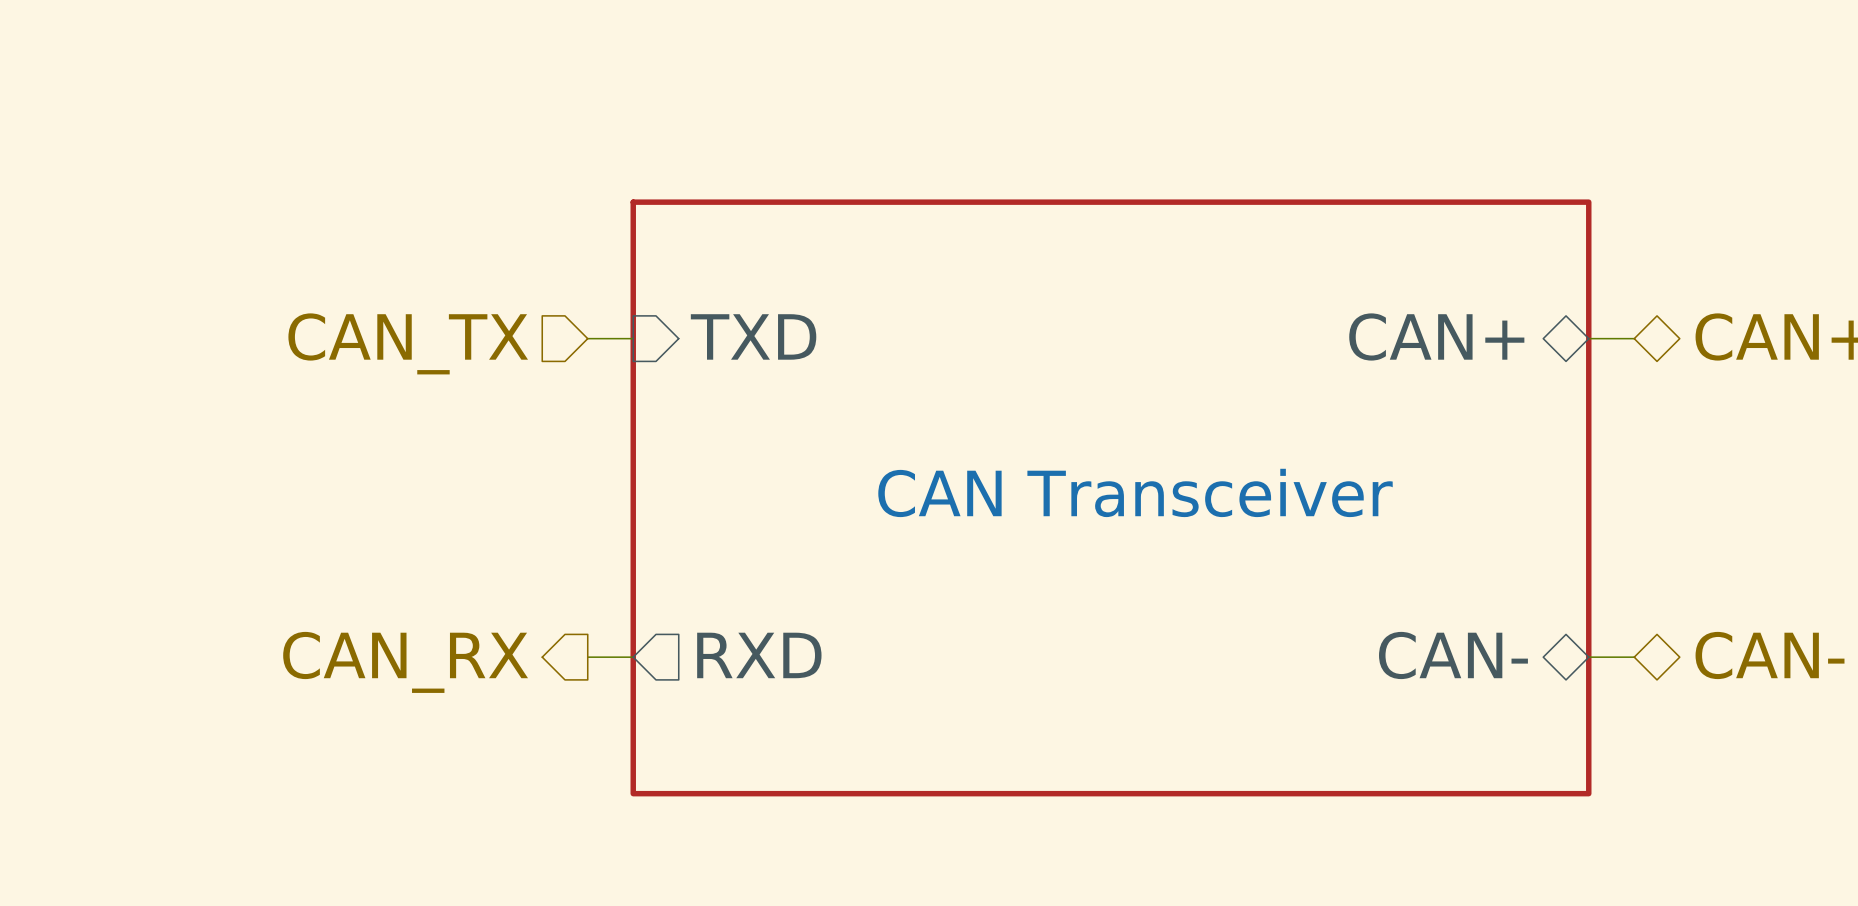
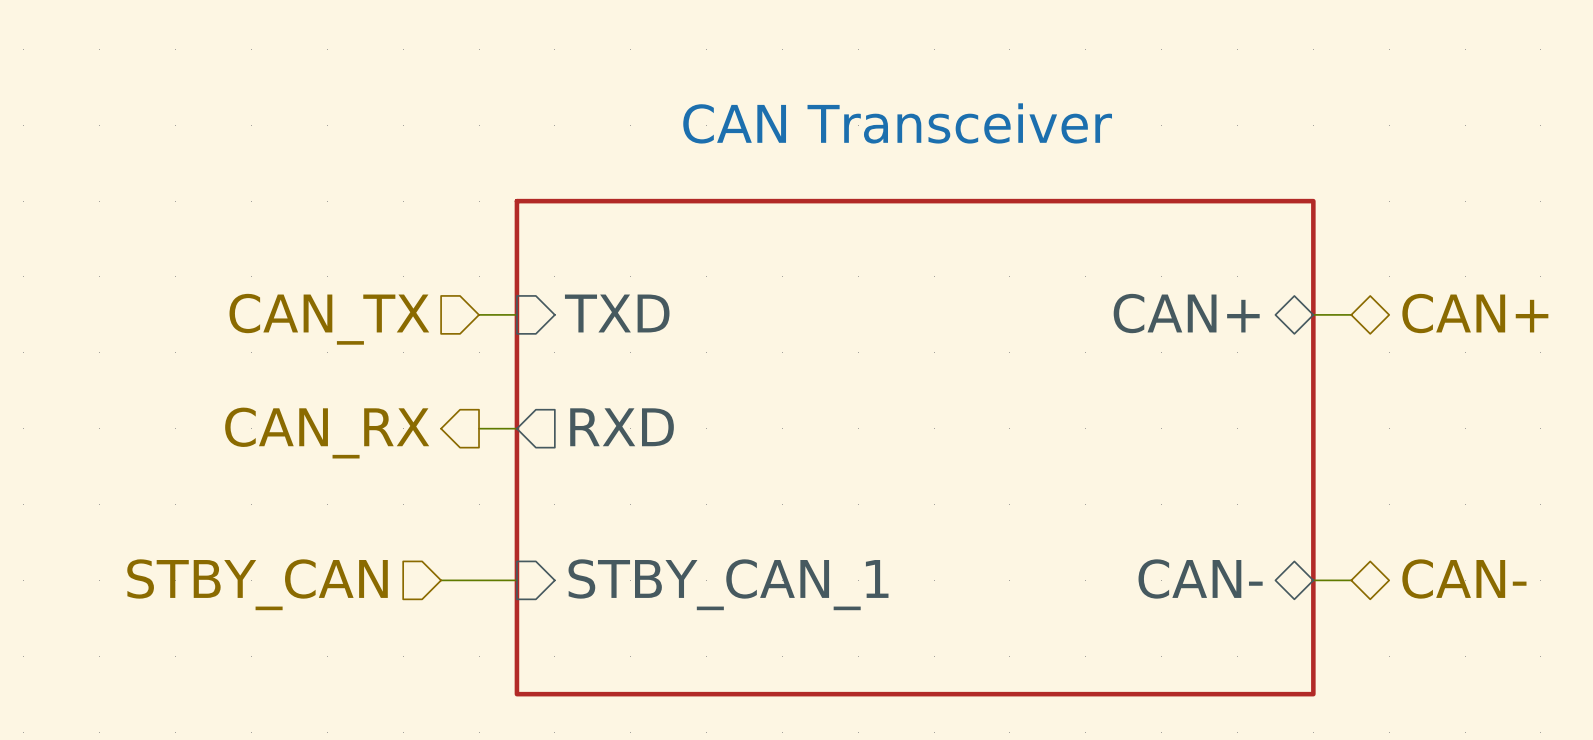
sheet pin: none -> RXD (622, 427)
wire: none -> (479, 428) (516, 428)
sheet CAN Transceiver name position: CAN Transceiver (1135, 492) -> CAN Transceiver (897, 123)
sheet pin shape: output (759, 655) -> input (728, 584)
sheet pin: RXD (759, 655) -> STBY_CAN_1 (728, 584)
wire: none -> (441, 580) (479, 580)
hierarchical label: none -> STBY_CAN (257, 584)
hierarchical label position: CAN_RX (405, 662) -> CAN_RX (327, 433)

